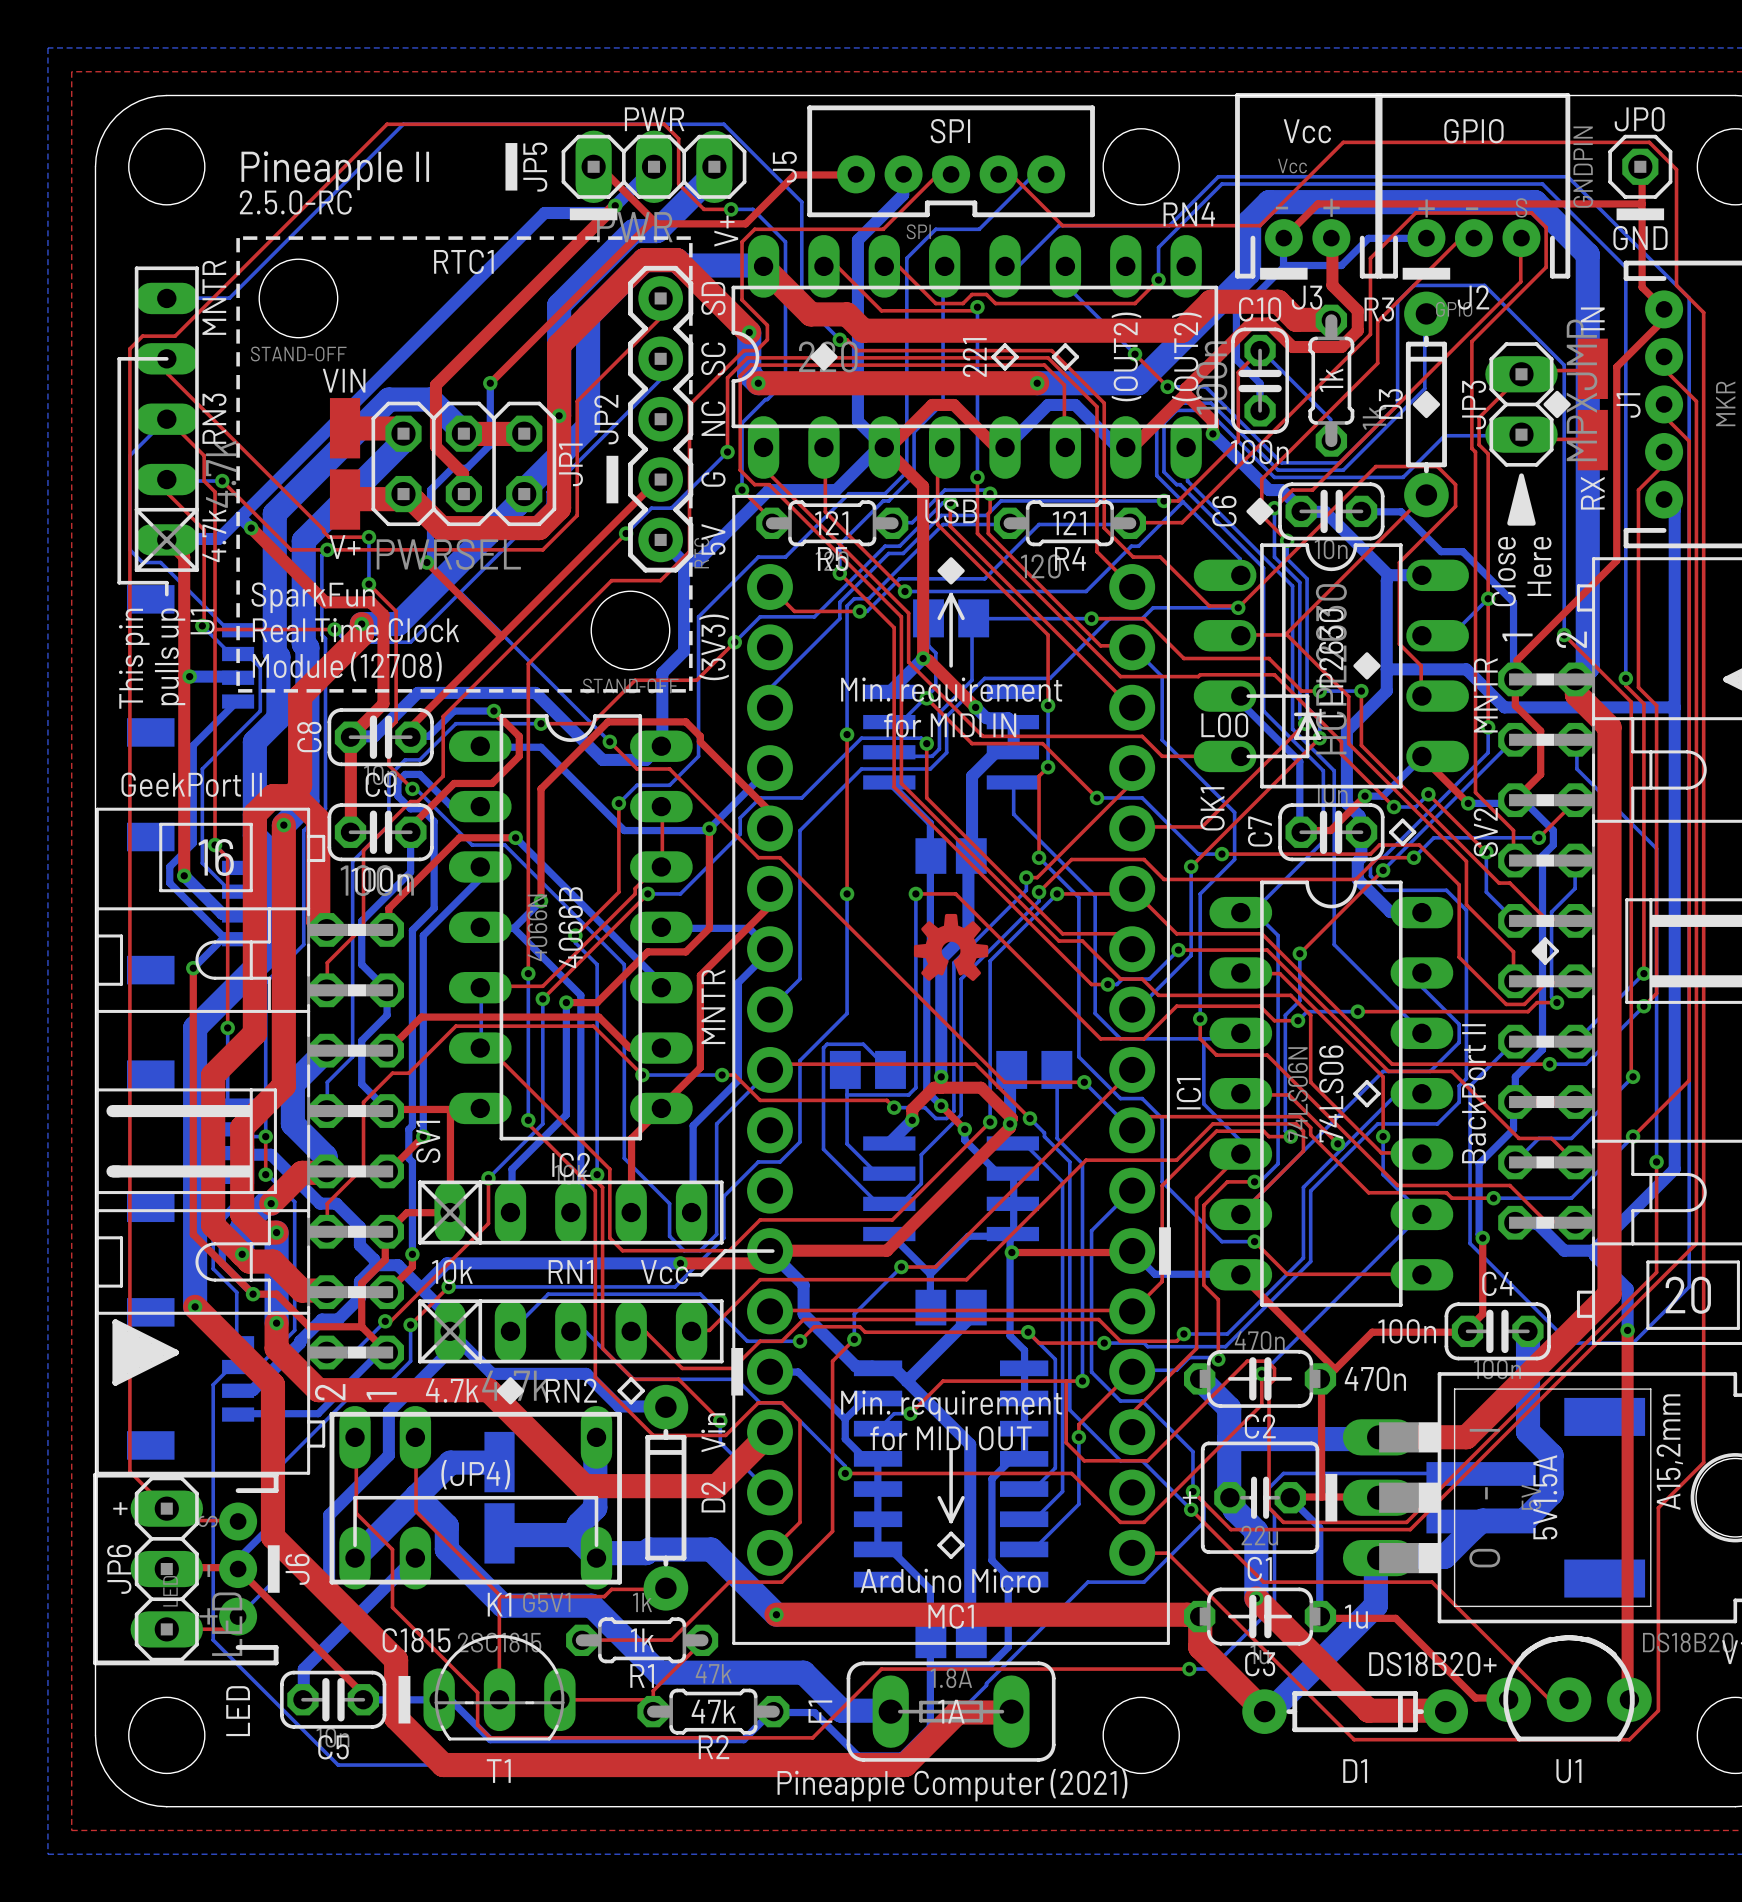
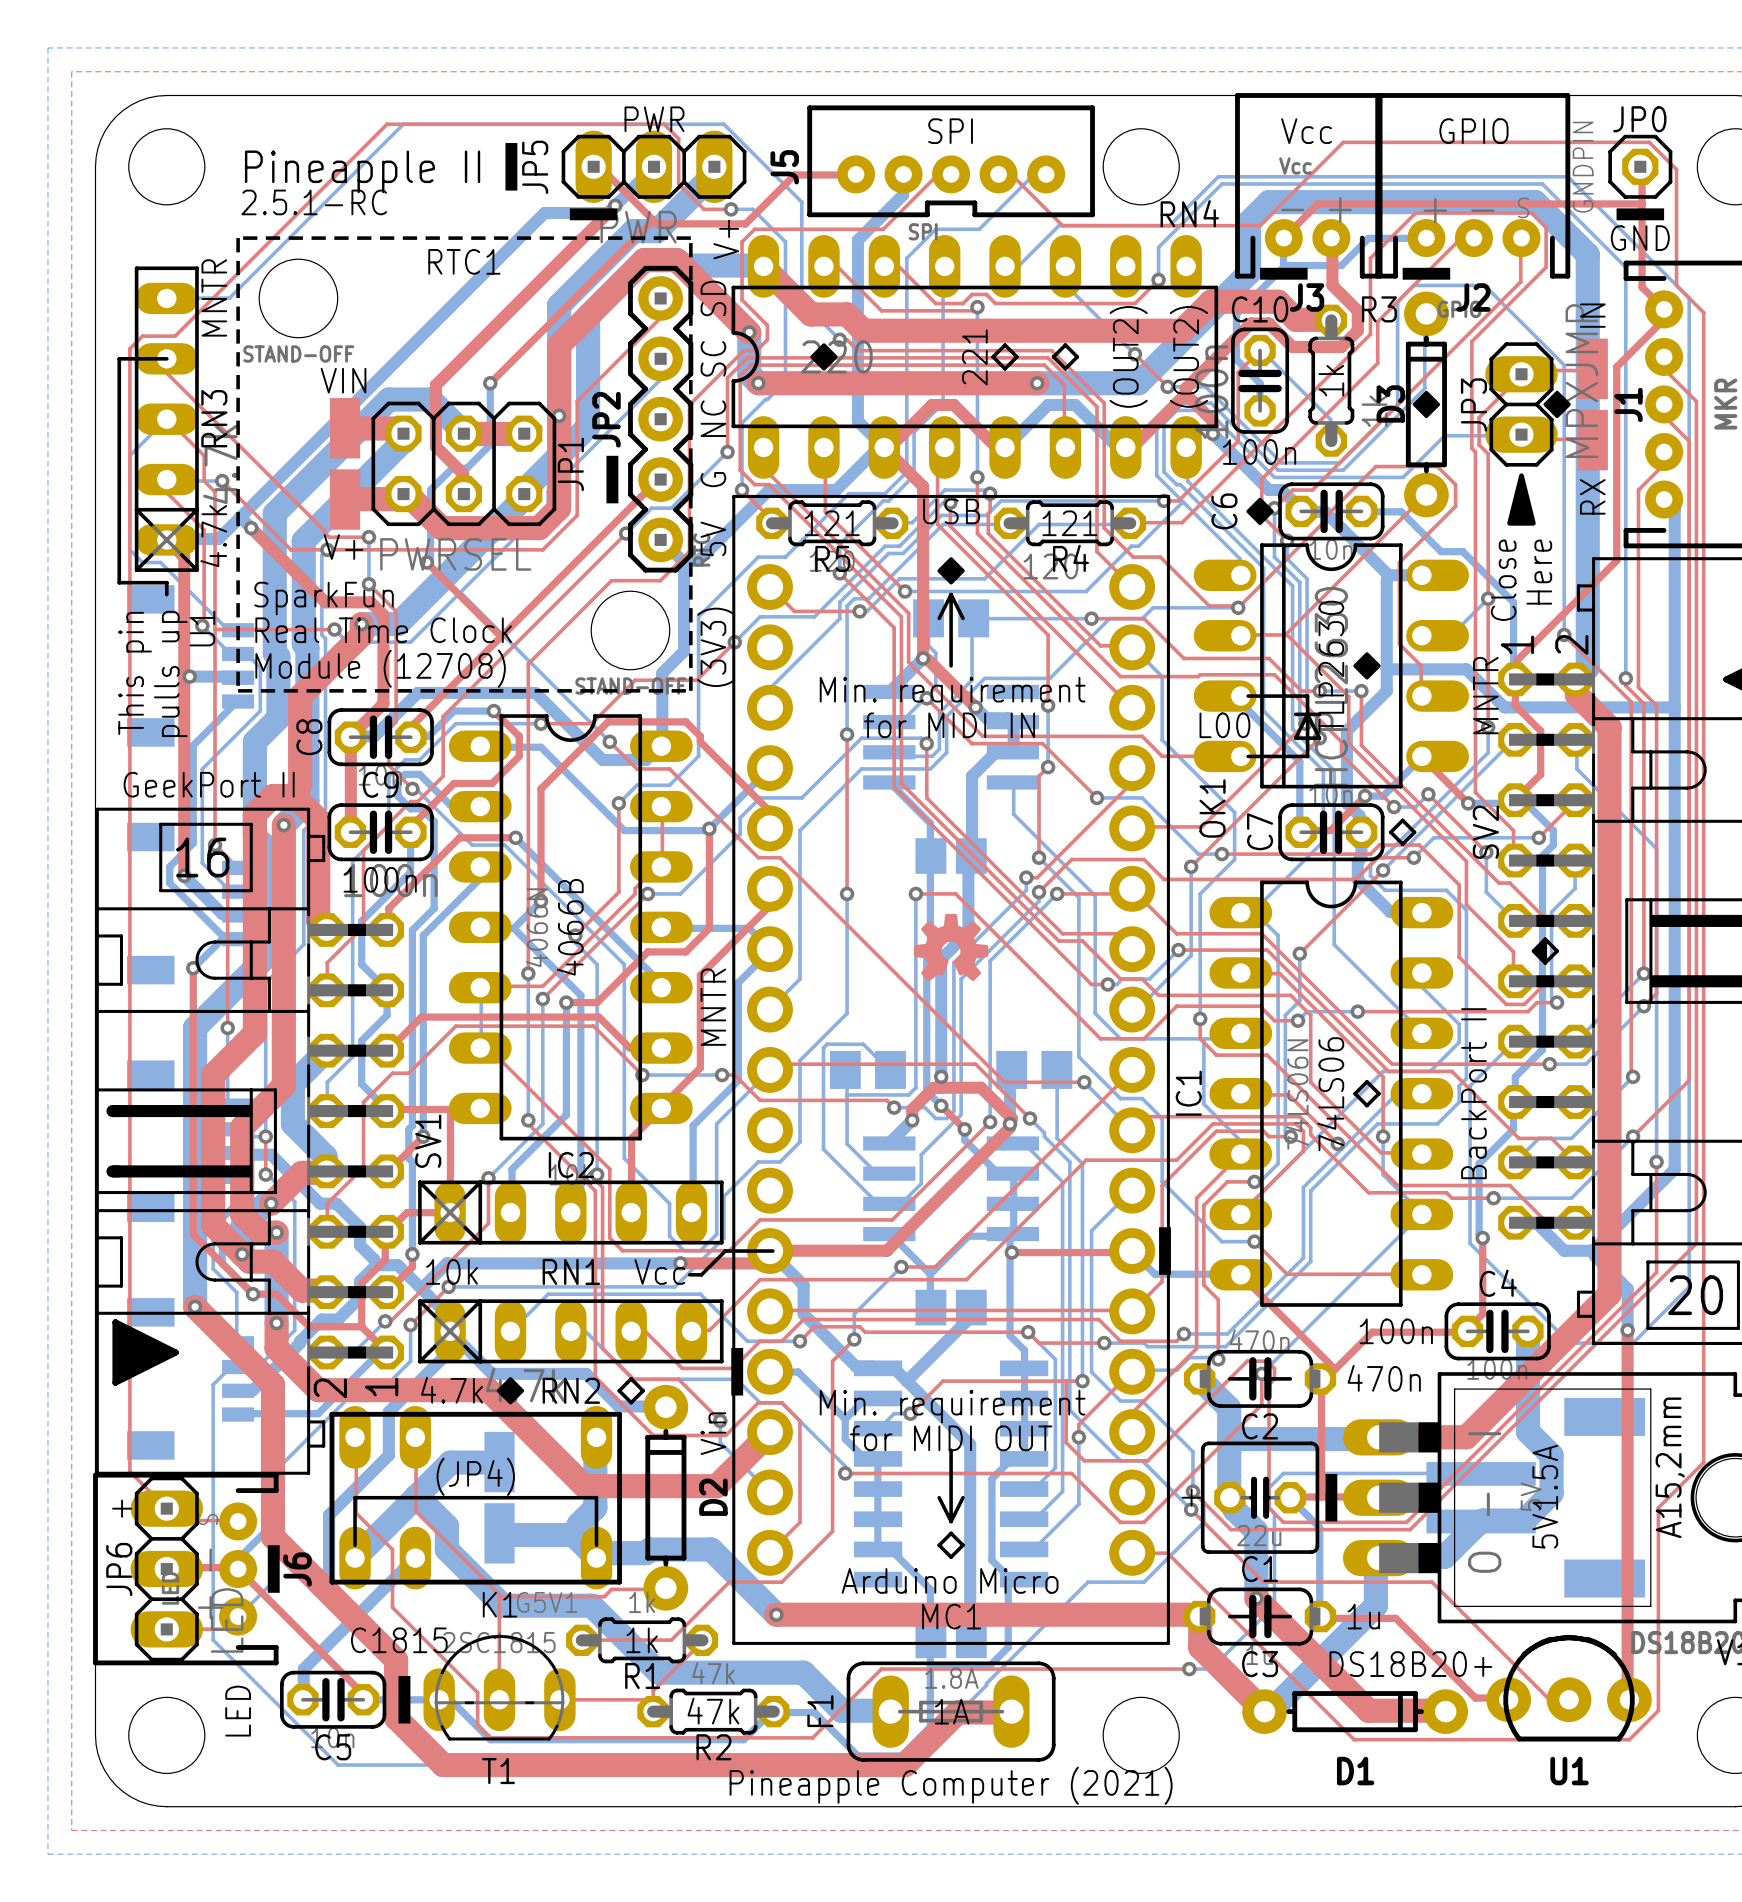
text: 2.5.0-RC (295, 202) -> 2.5.1-RC (314, 202)

